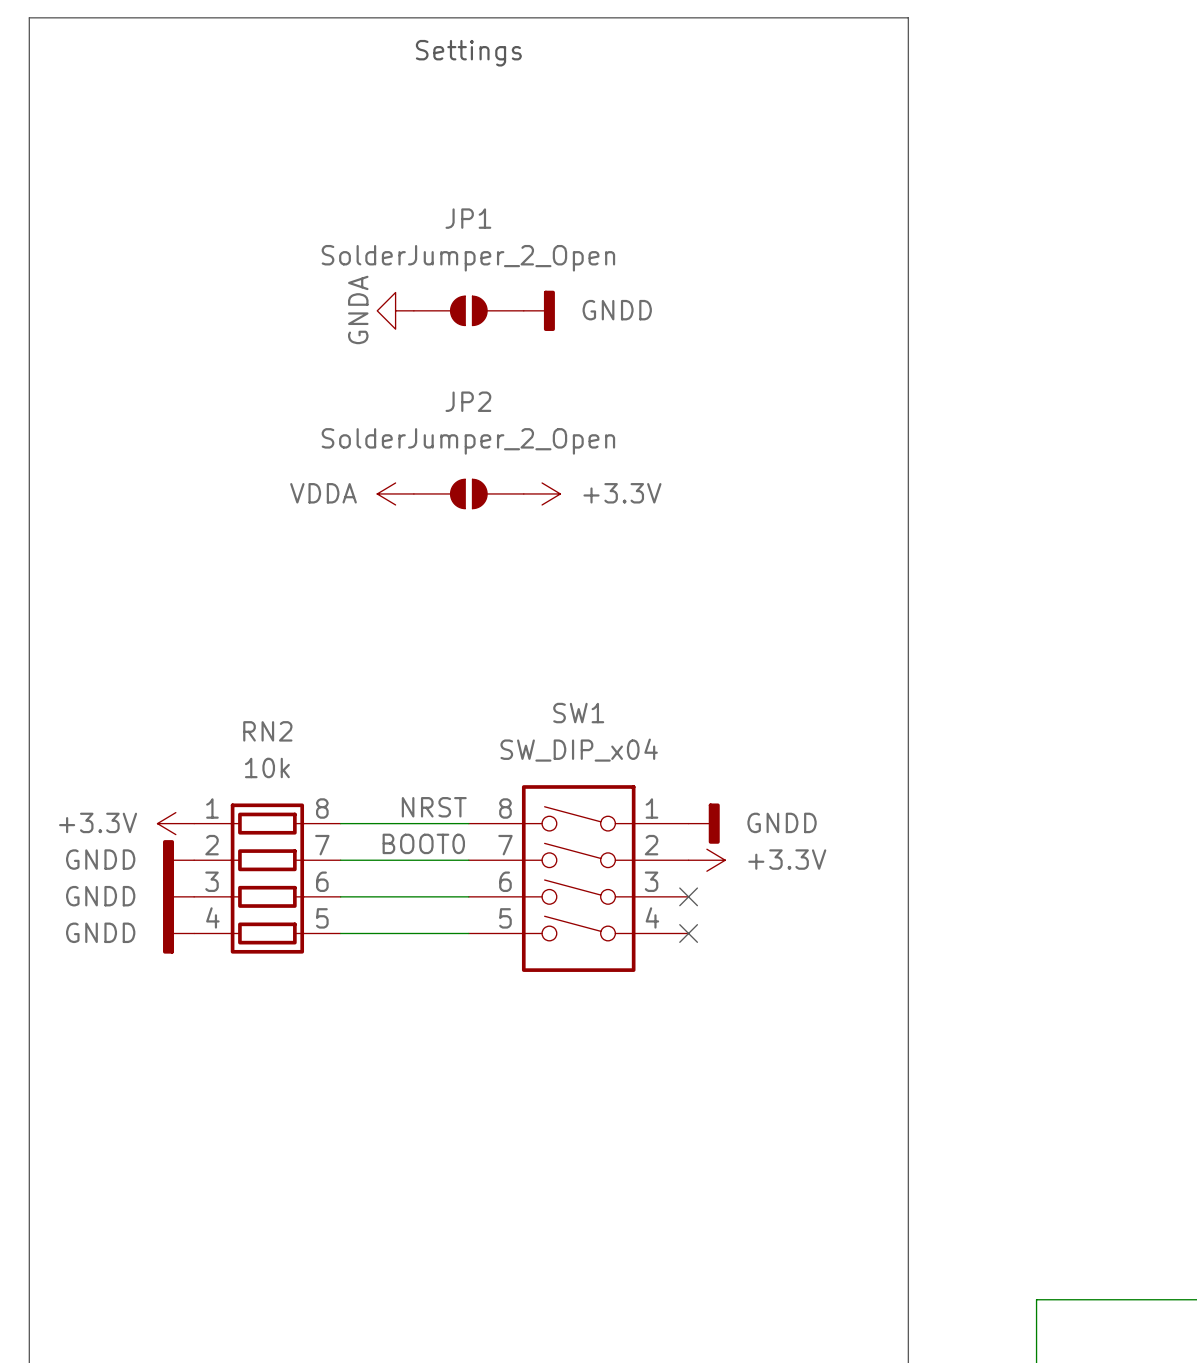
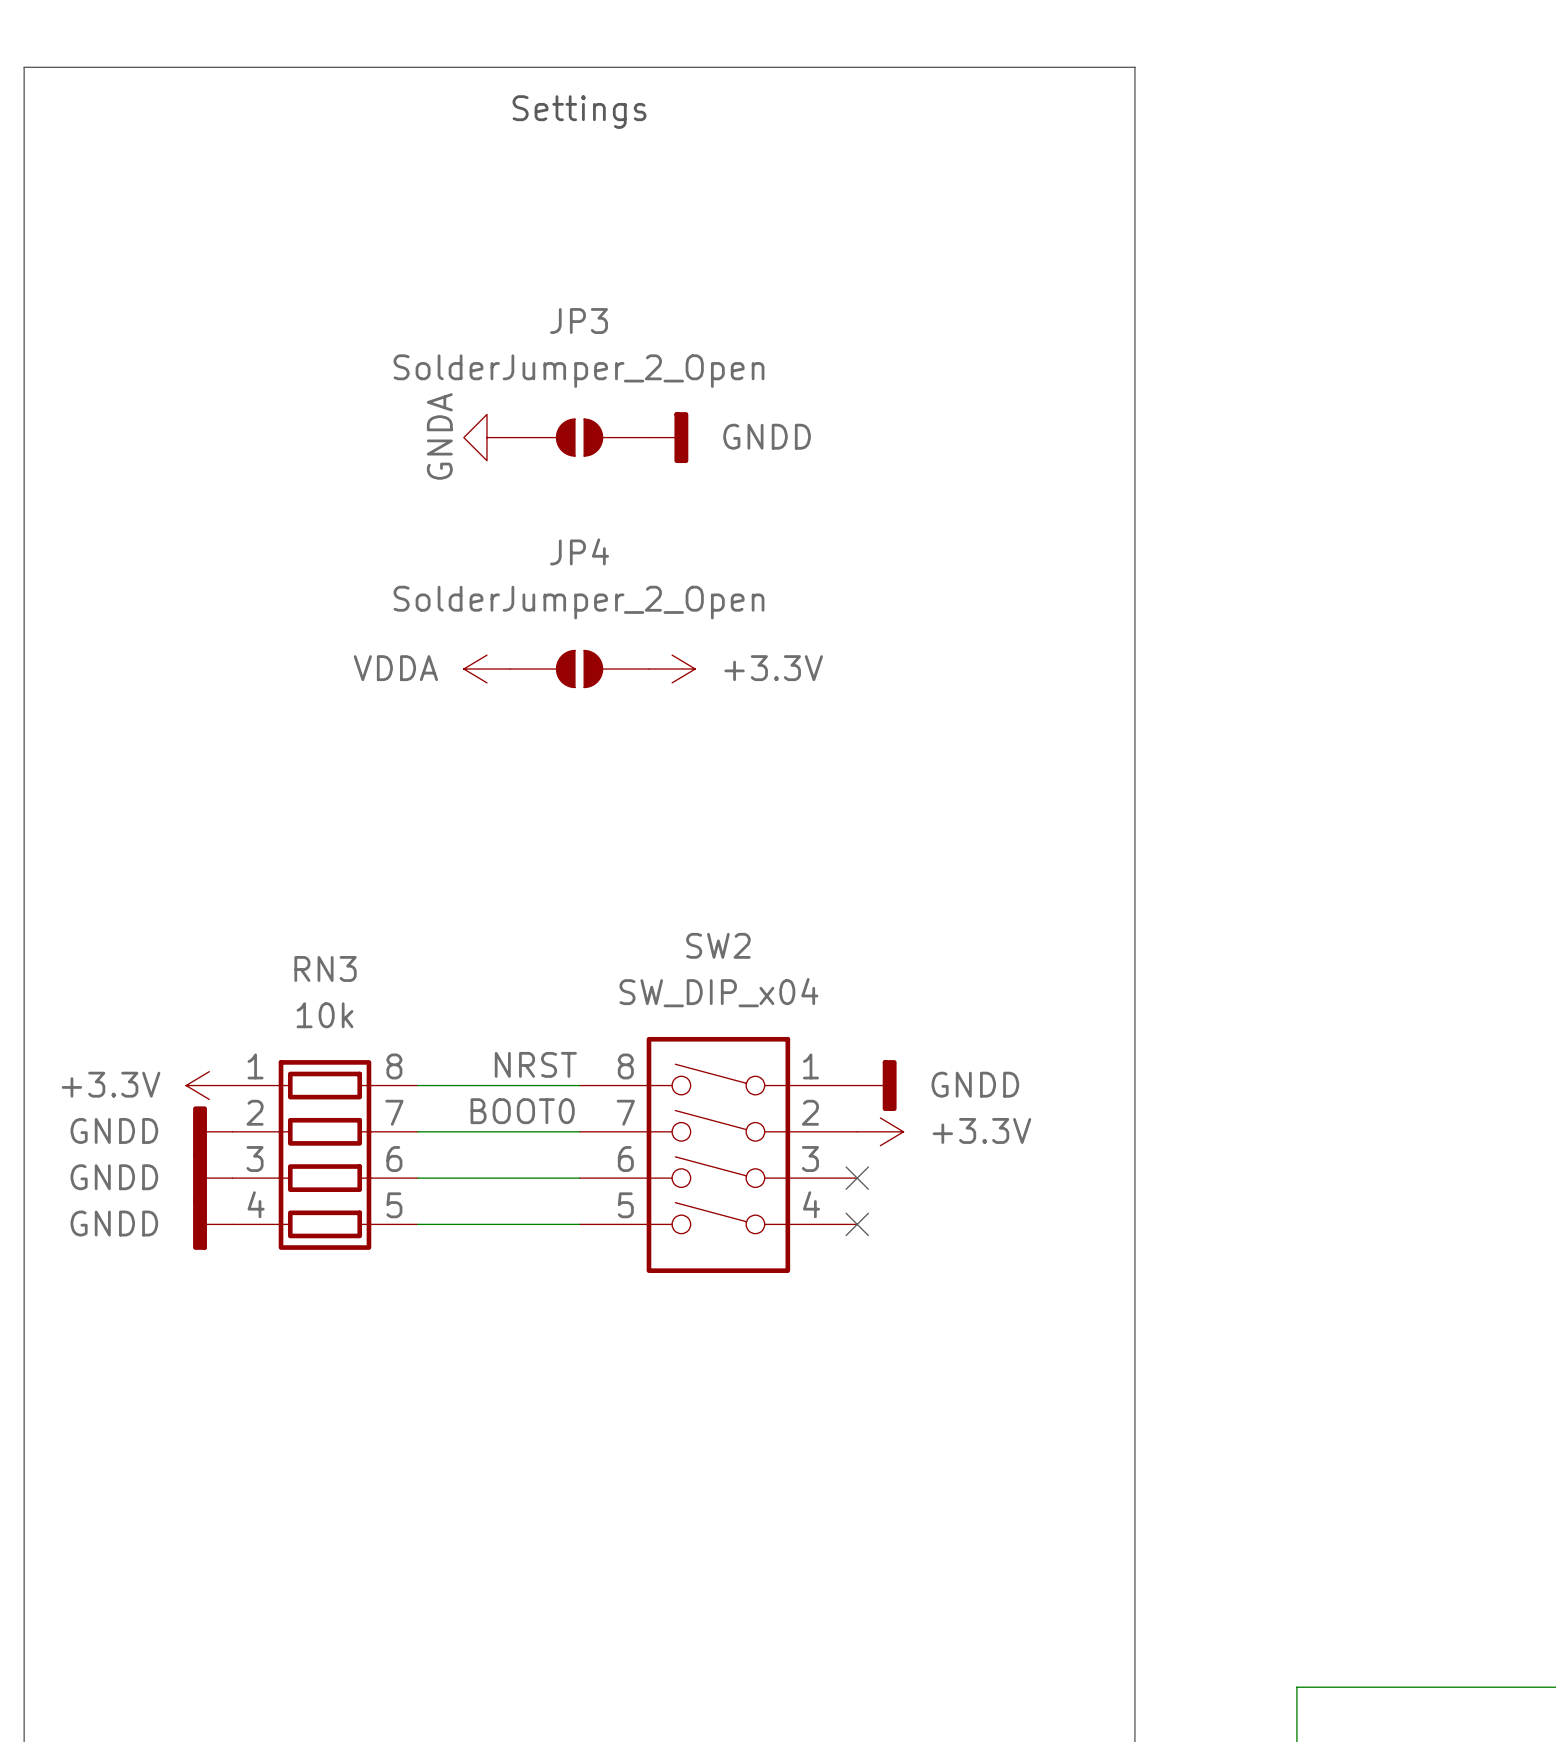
JP1 name: JP1 (468, 218) -> JP3 (579, 321)
JP2 name: JP2 (468, 401) -> JP4 (579, 551)
SW1 name: SW1 (578, 713) -> SW2 (718, 945)
RN2 name: RN2 (267, 731) -> RN3 (325, 968)

